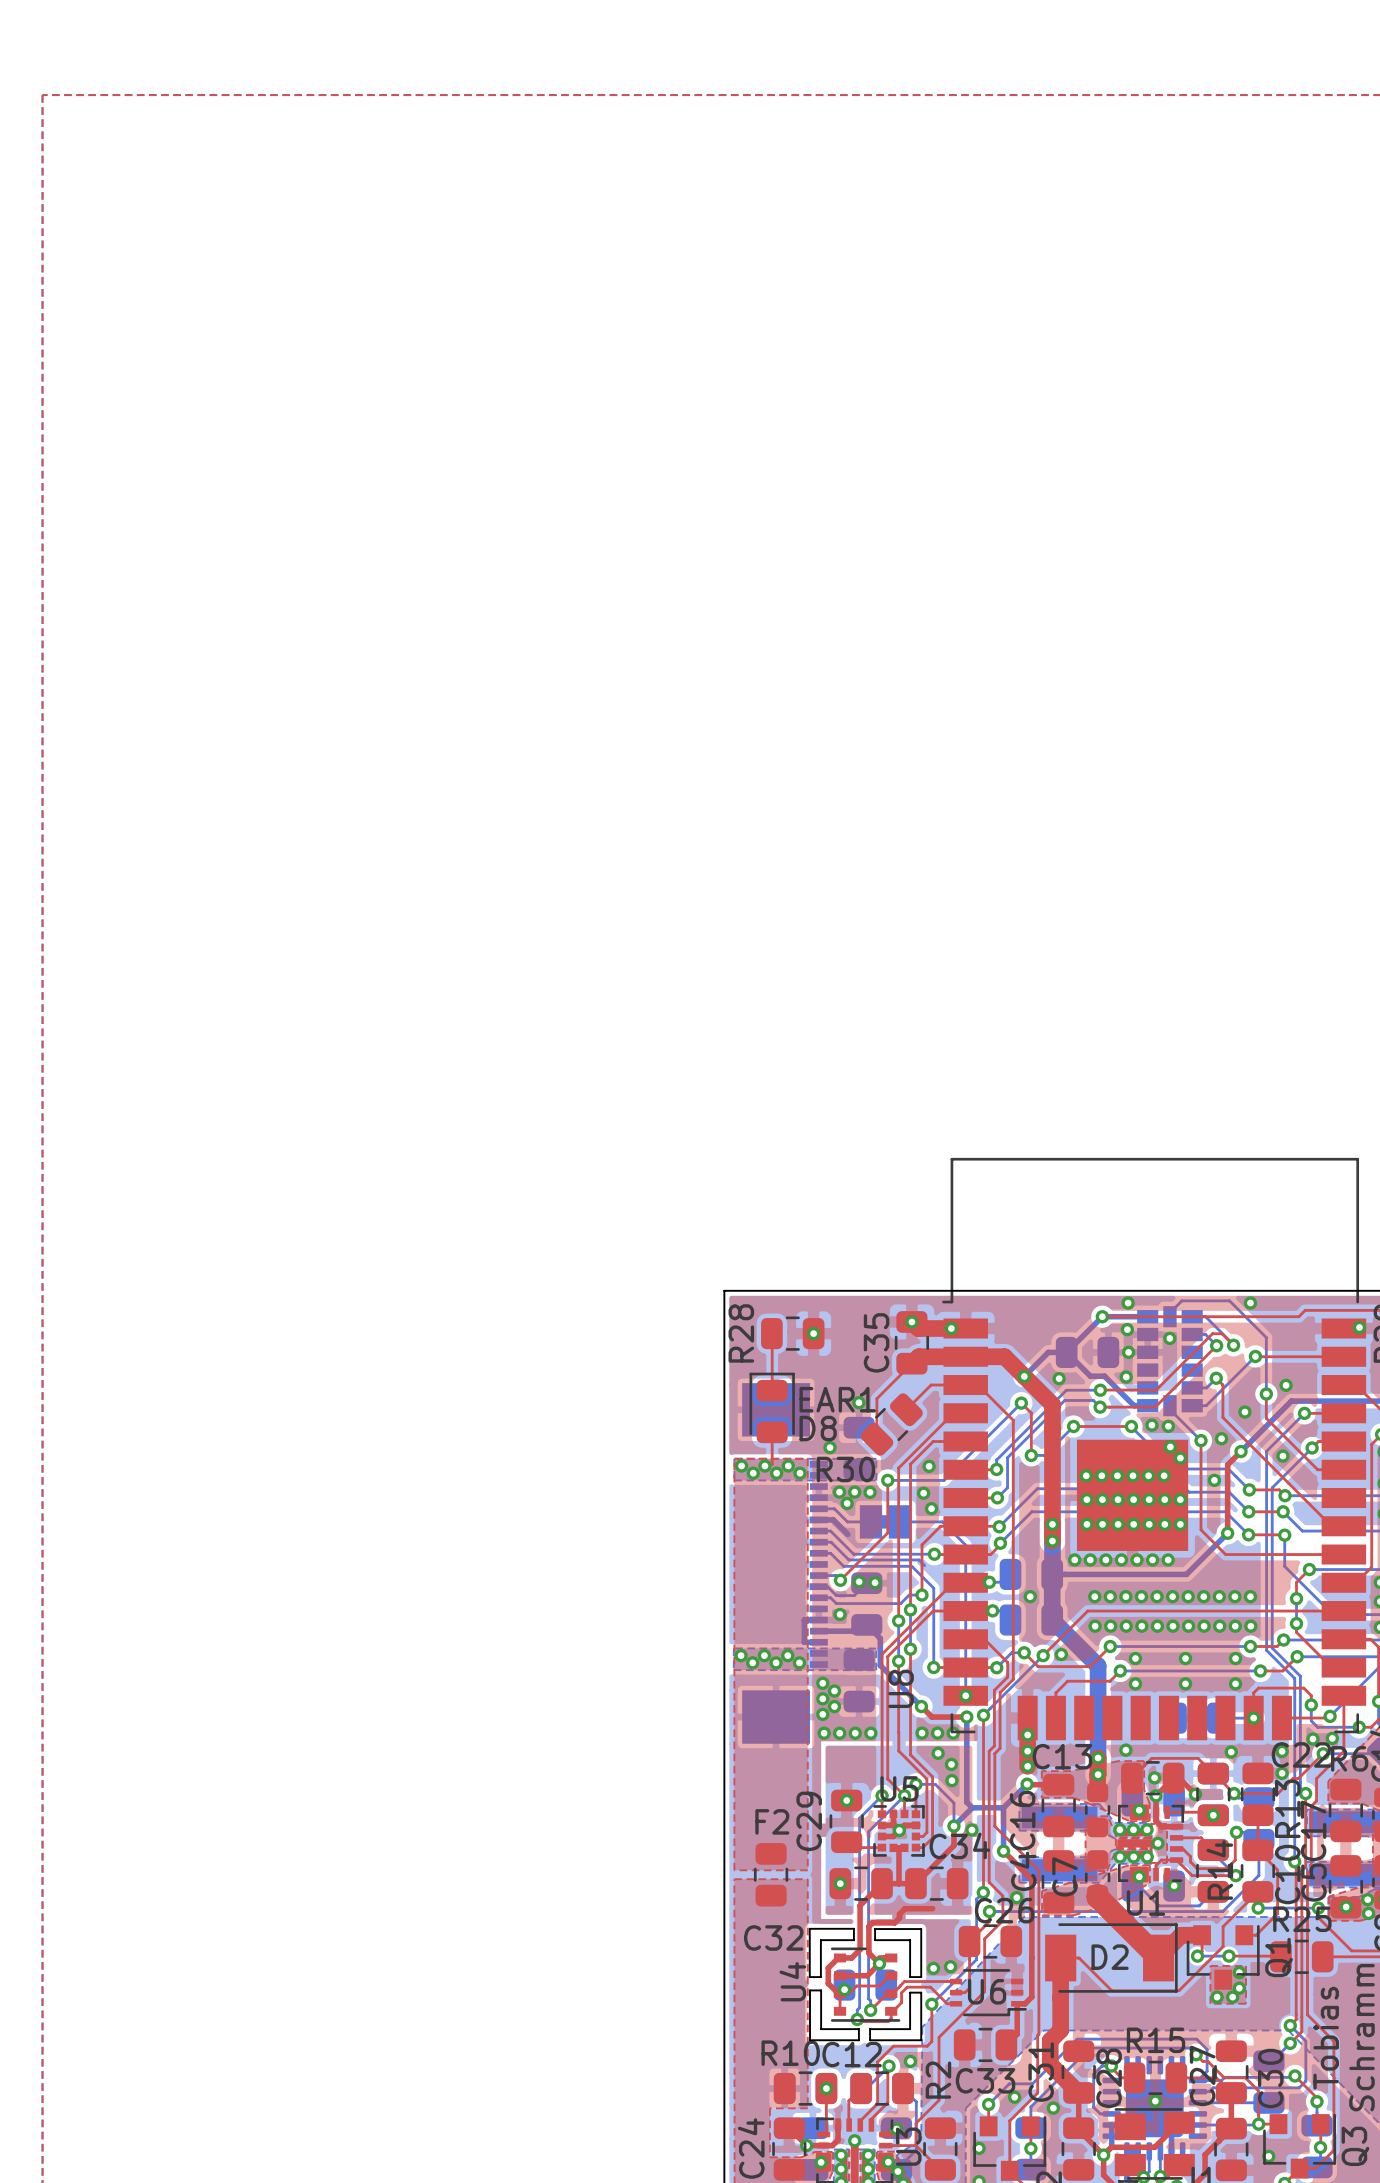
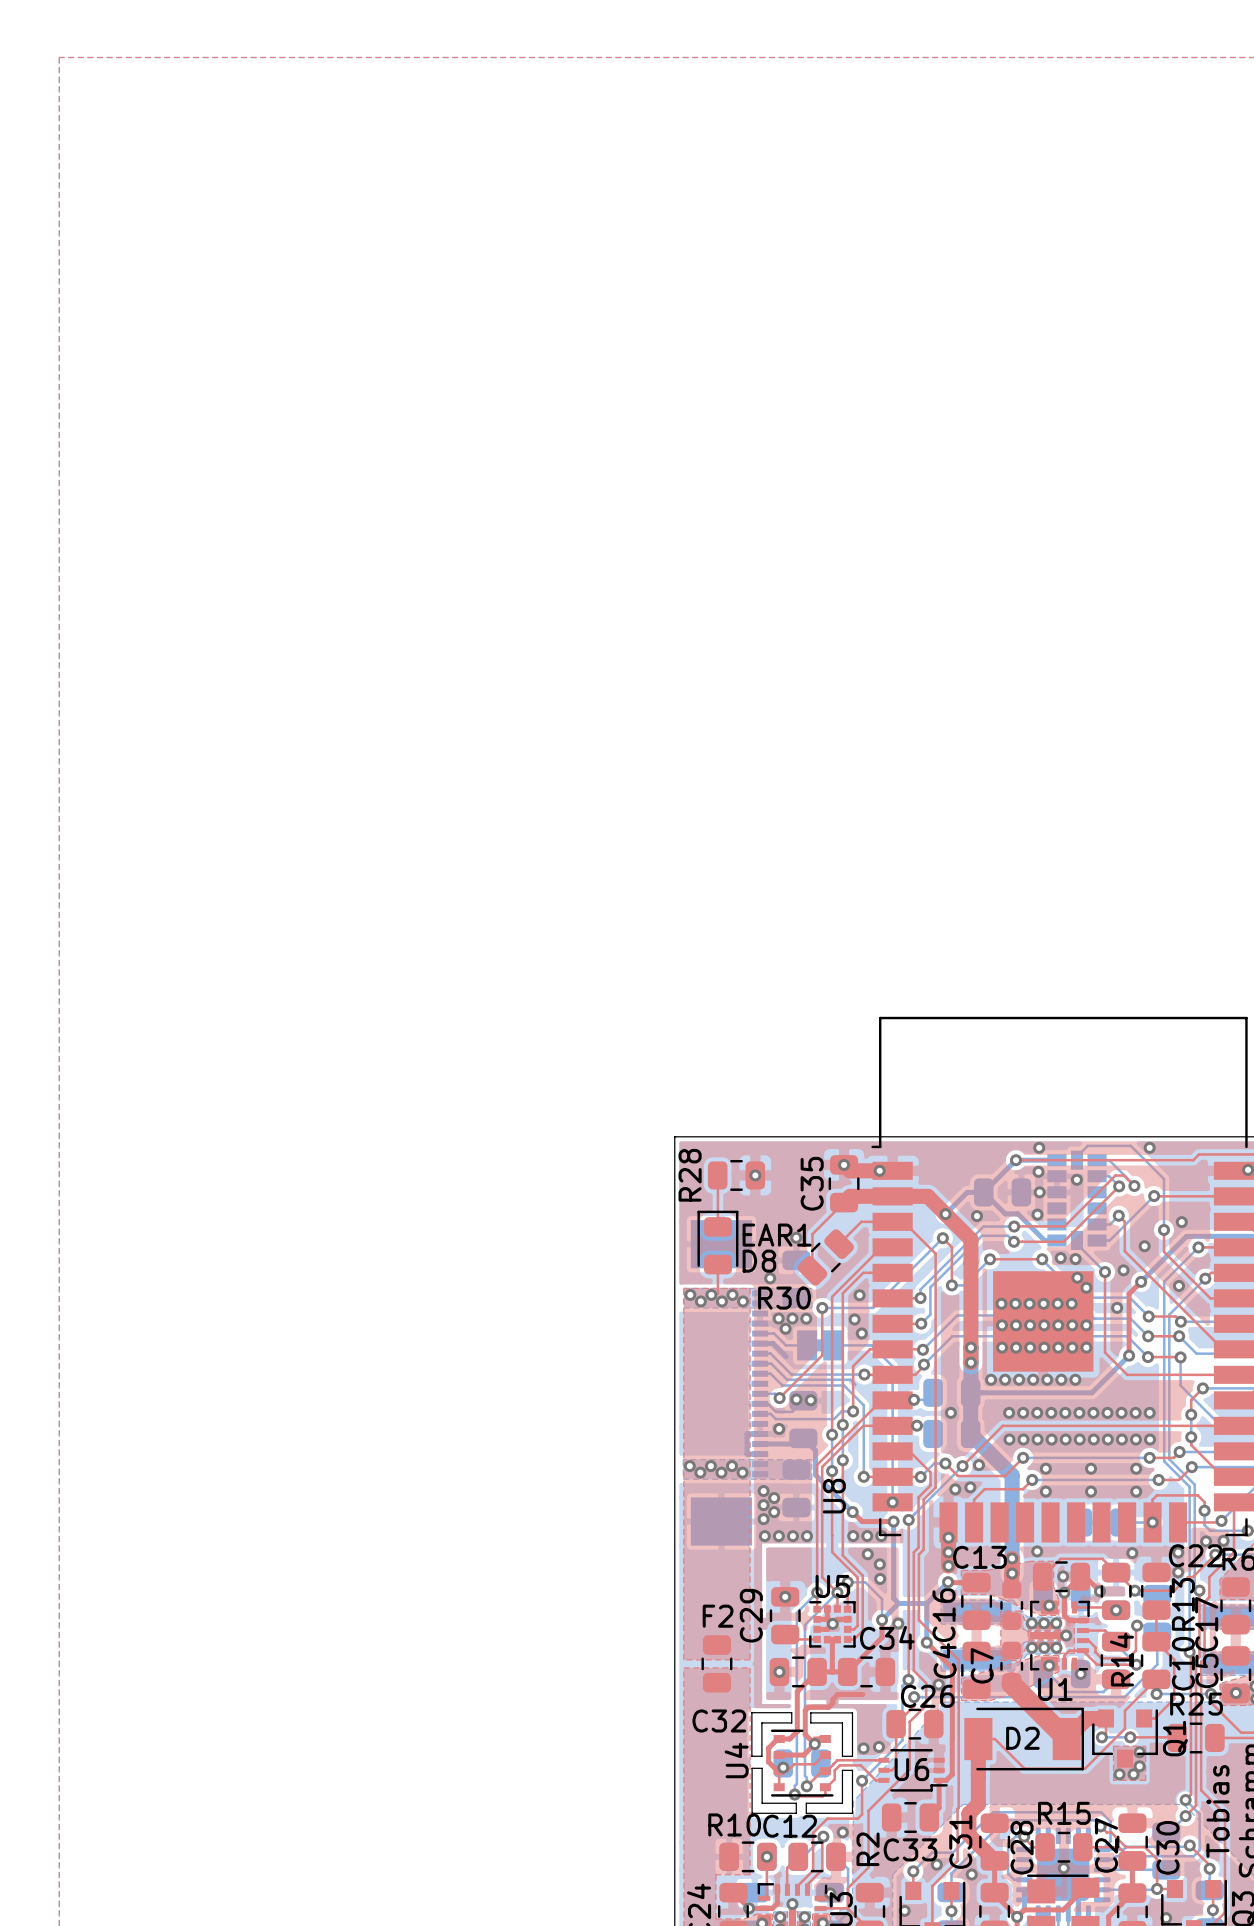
via: none -> (970, 1487)
via: none -> (955, 1489)

